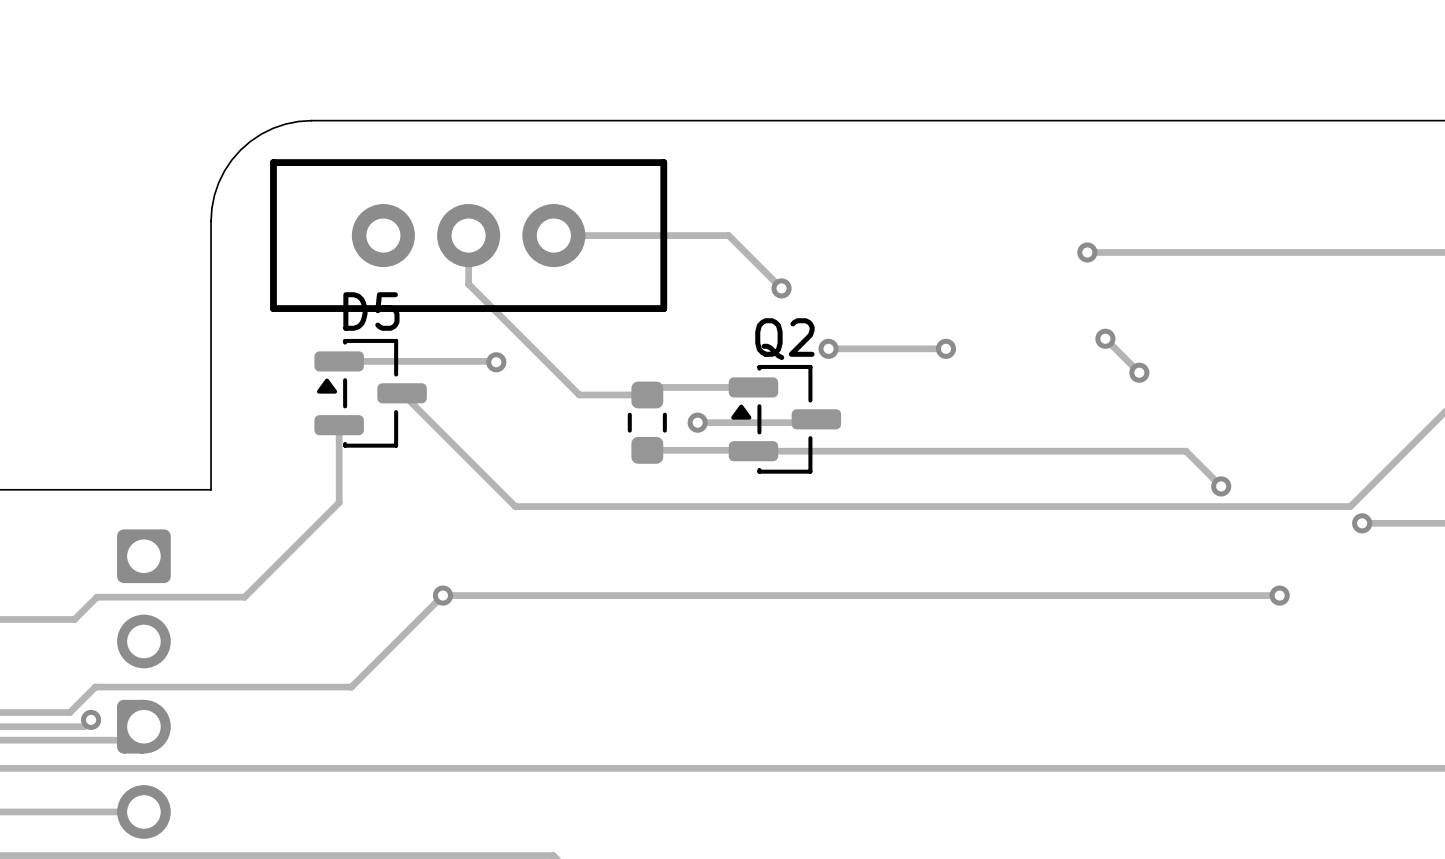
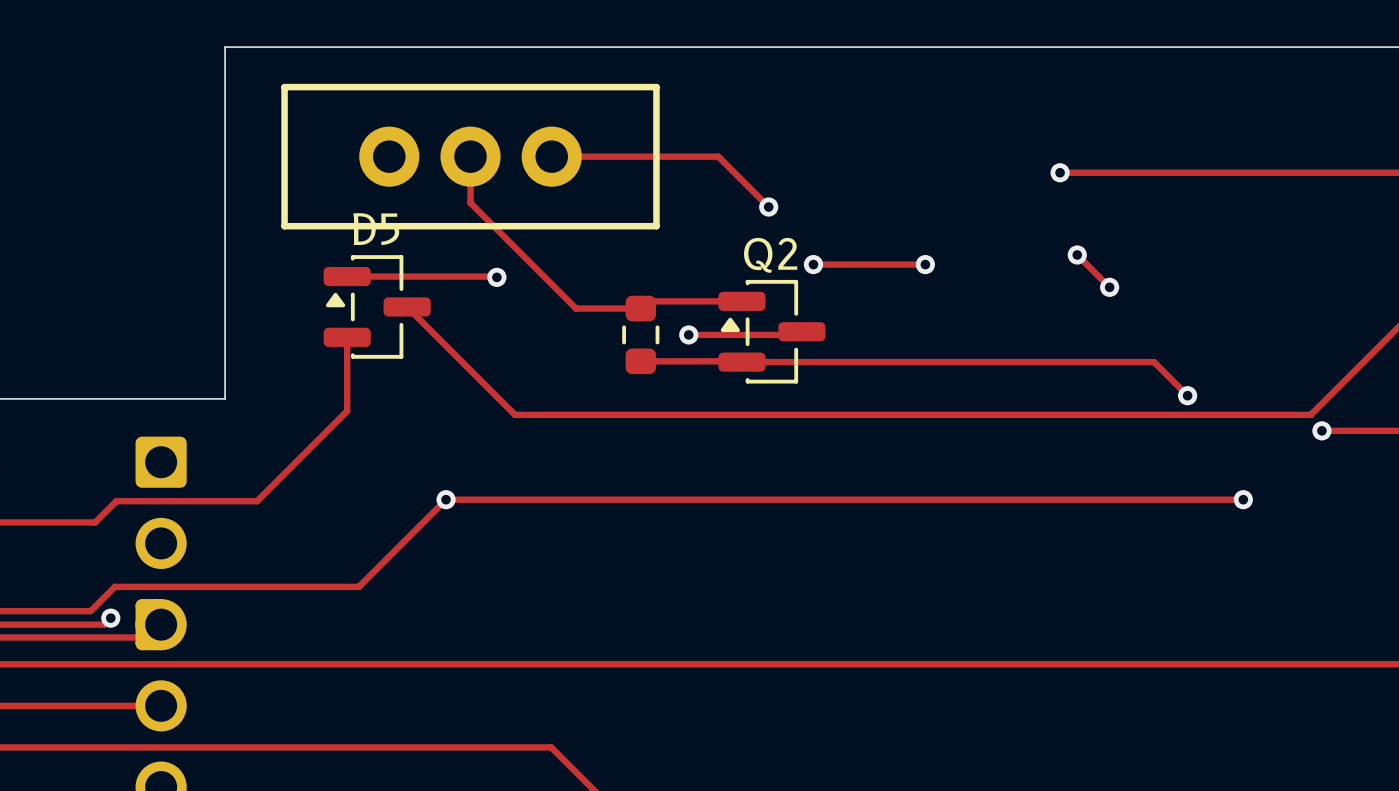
board edge: (311, 120) (285, 124) (273, 128) (250, 141) (240, 150) (224, 170) (218, 182) (214, 195) (211, 221) -> (321, 47) (225, 47) (225, 143)

